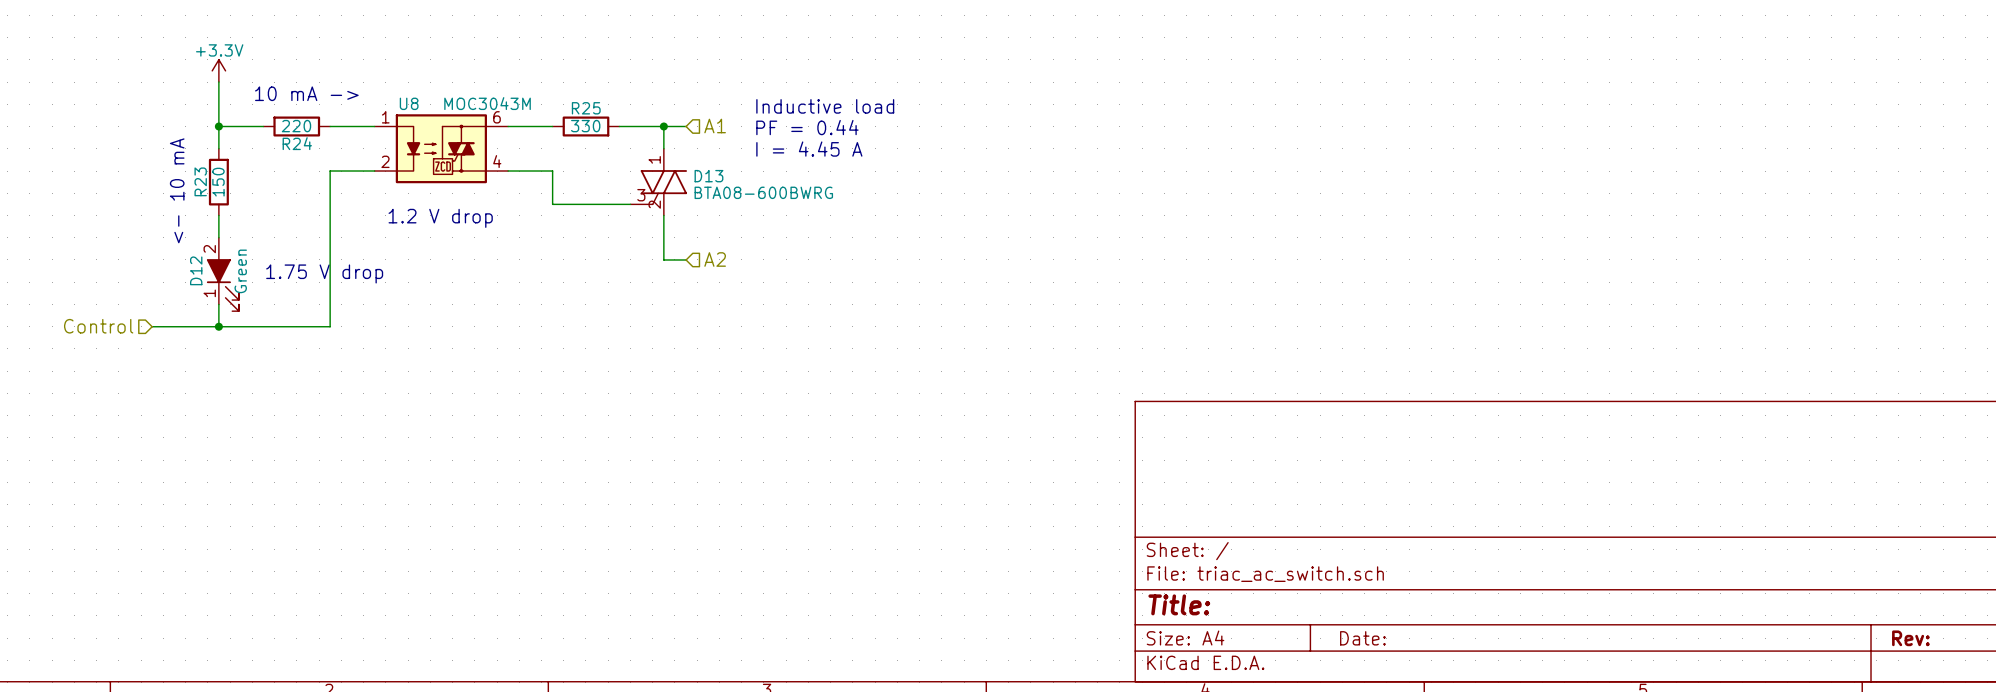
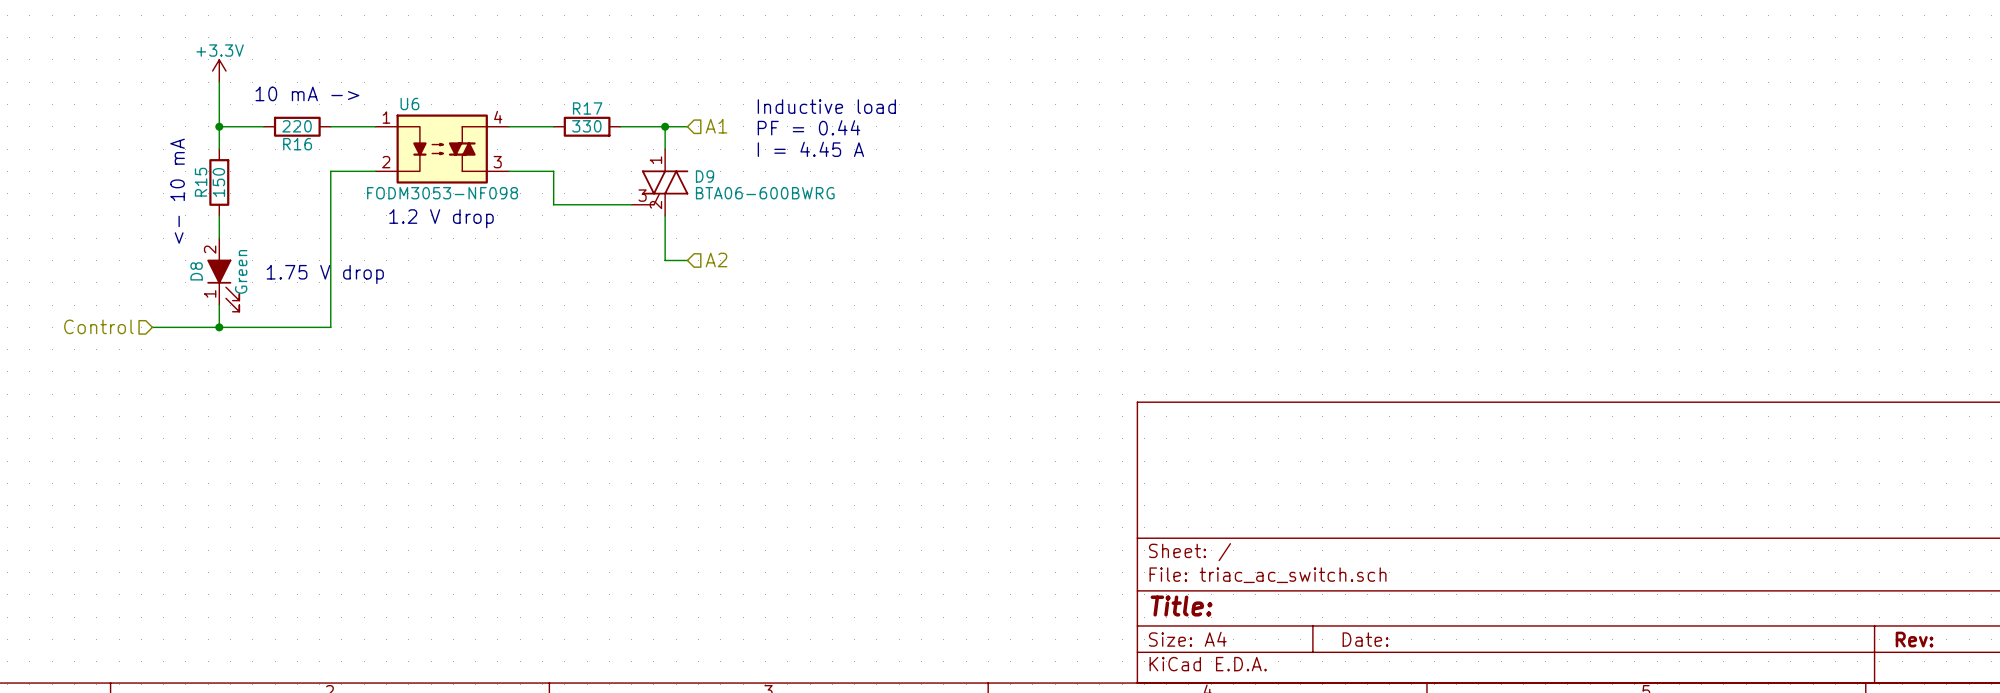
R25 name: R25 (586, 108) -> R17 (587, 108)
R24 name: R24 (297, 143) -> R16 (297, 144)
U8: MOC3043M (441, 148) -> none
U6: none -> FODM3053-NF098 (442, 149)
D13 name: D13 (708, 176) -> D9 (705, 176)
R23 name: R23 (200, 181) -> R15 (201, 182)
D13 value: BTA08-600BWRG (763, 192) -> BTA06-600BWRG (765, 193)
D12 name: D12 (196, 270) -> D8 (196, 271)

